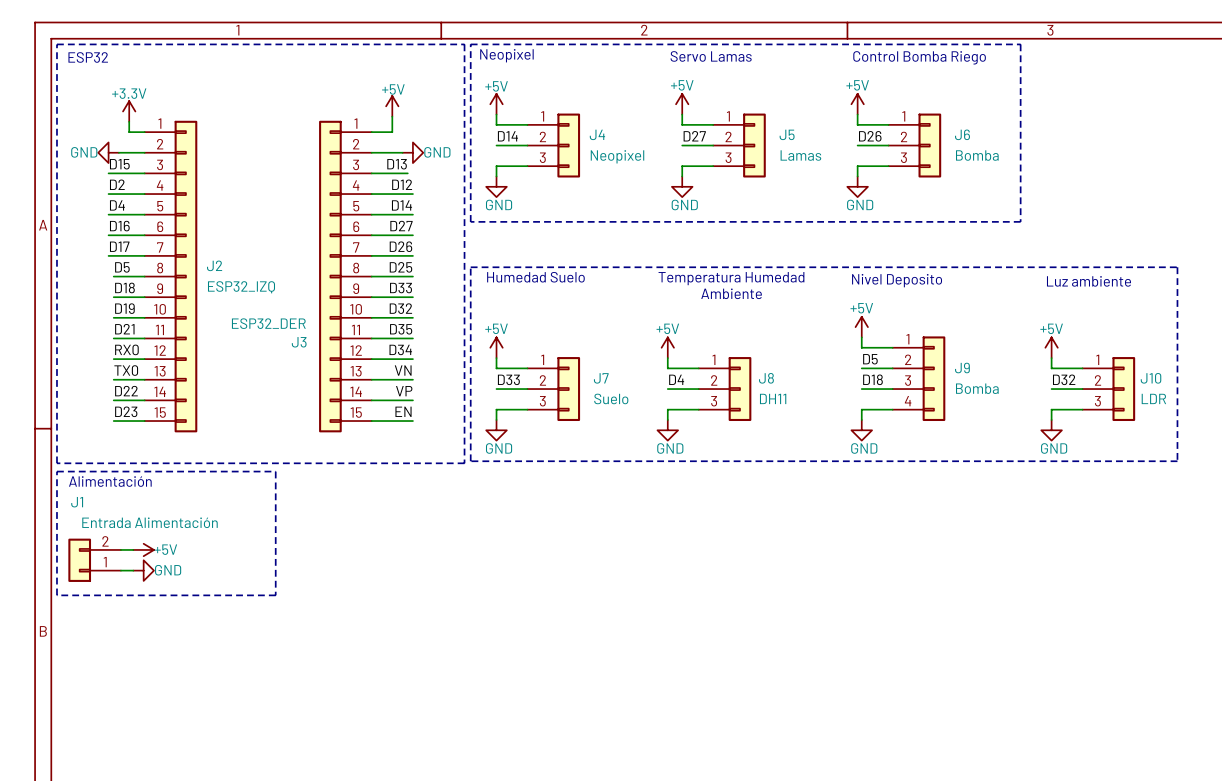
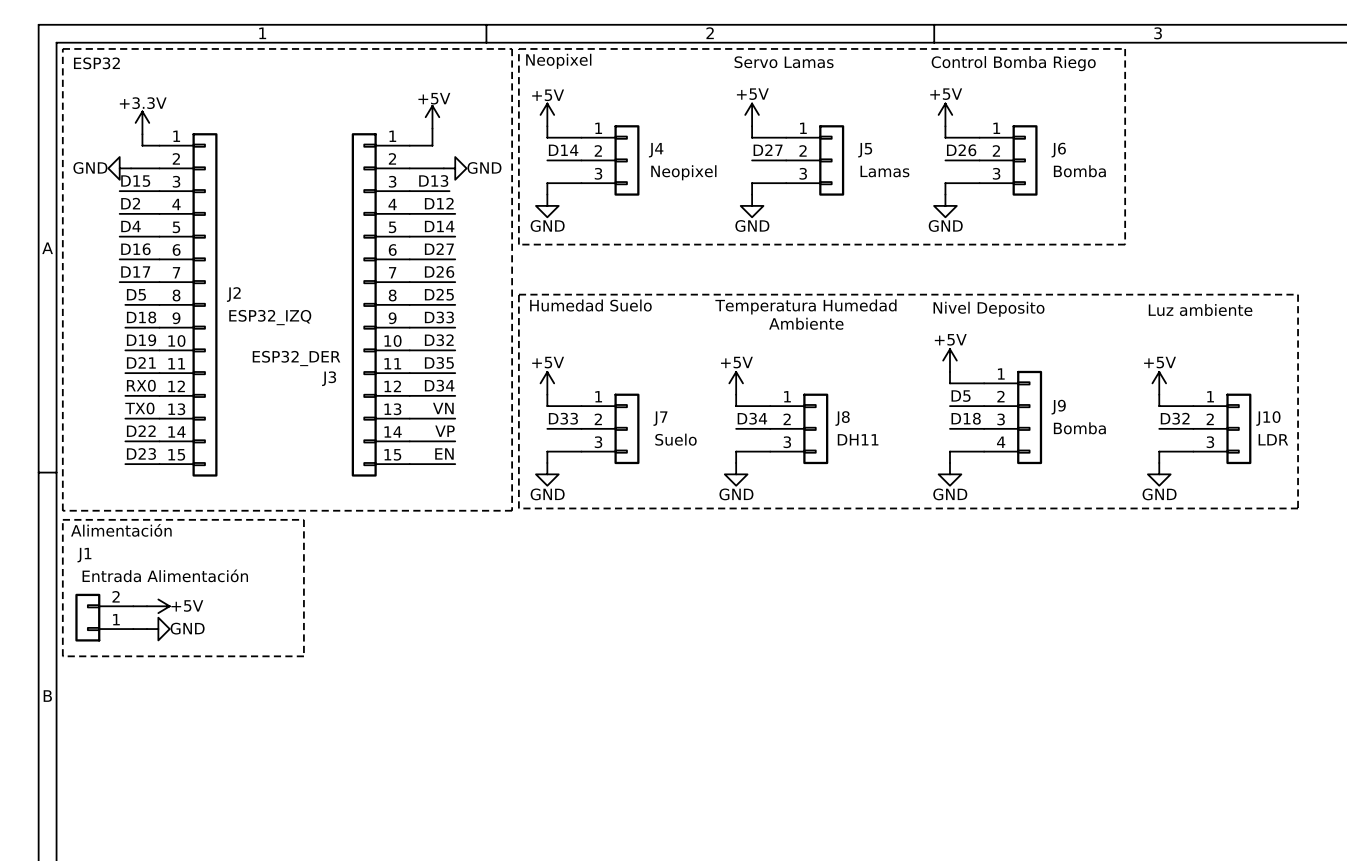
label: D4 (676, 379) -> D34 (752, 418)

